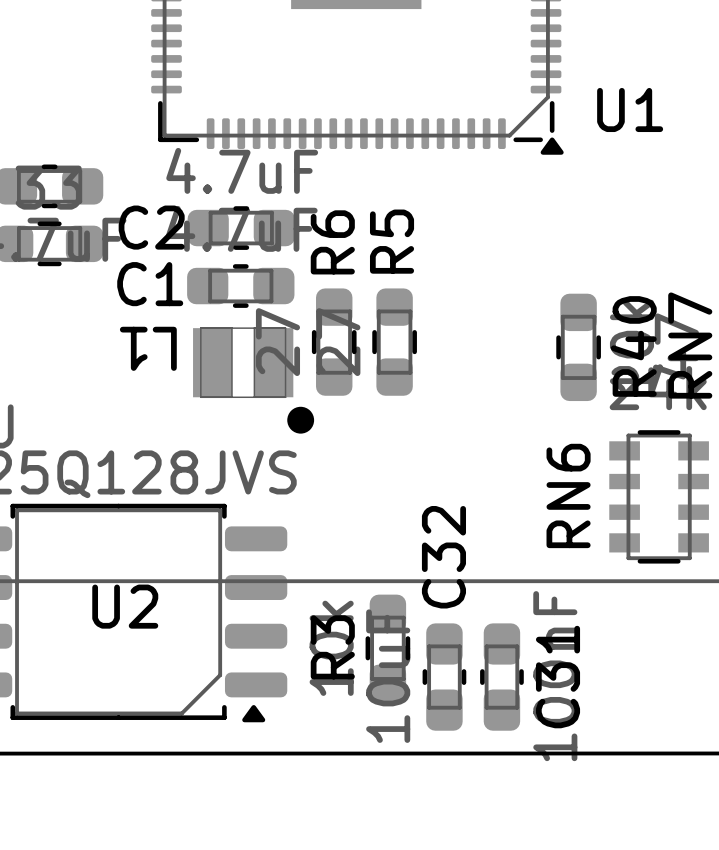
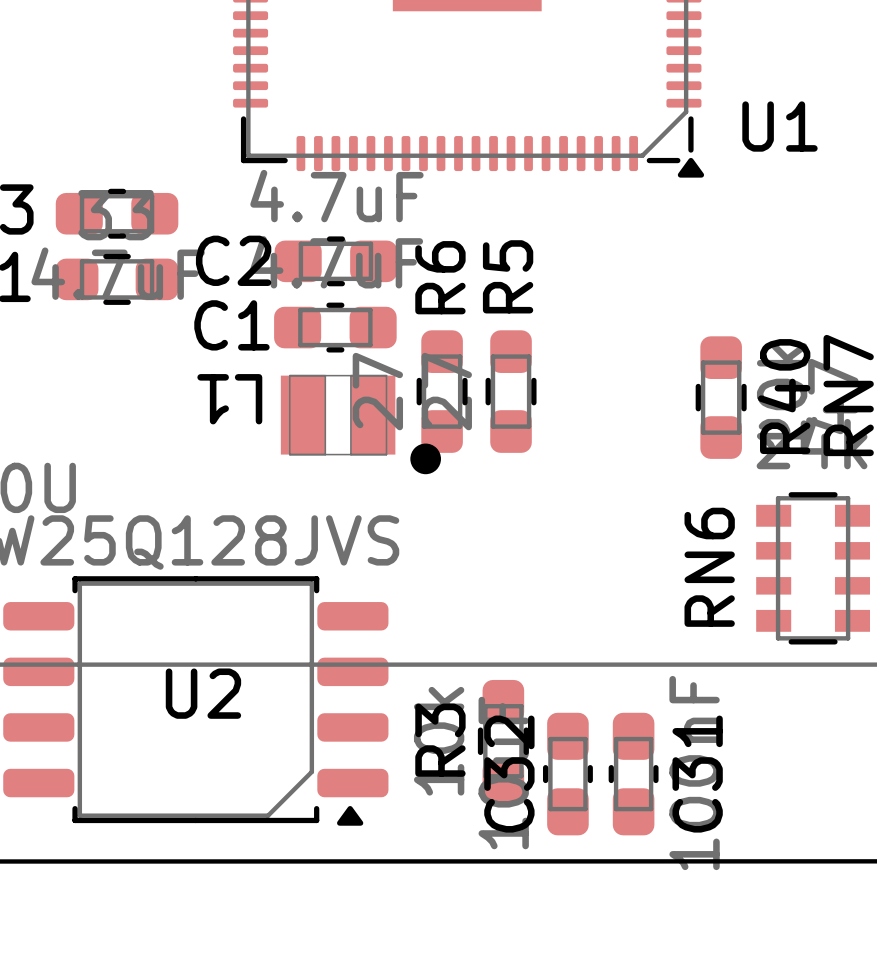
L1 footprint: [193, 327, 315, 434] -> [280, 375, 441, 475]
C32 name position: C32 (443, 557) -> C32 (509, 774)

